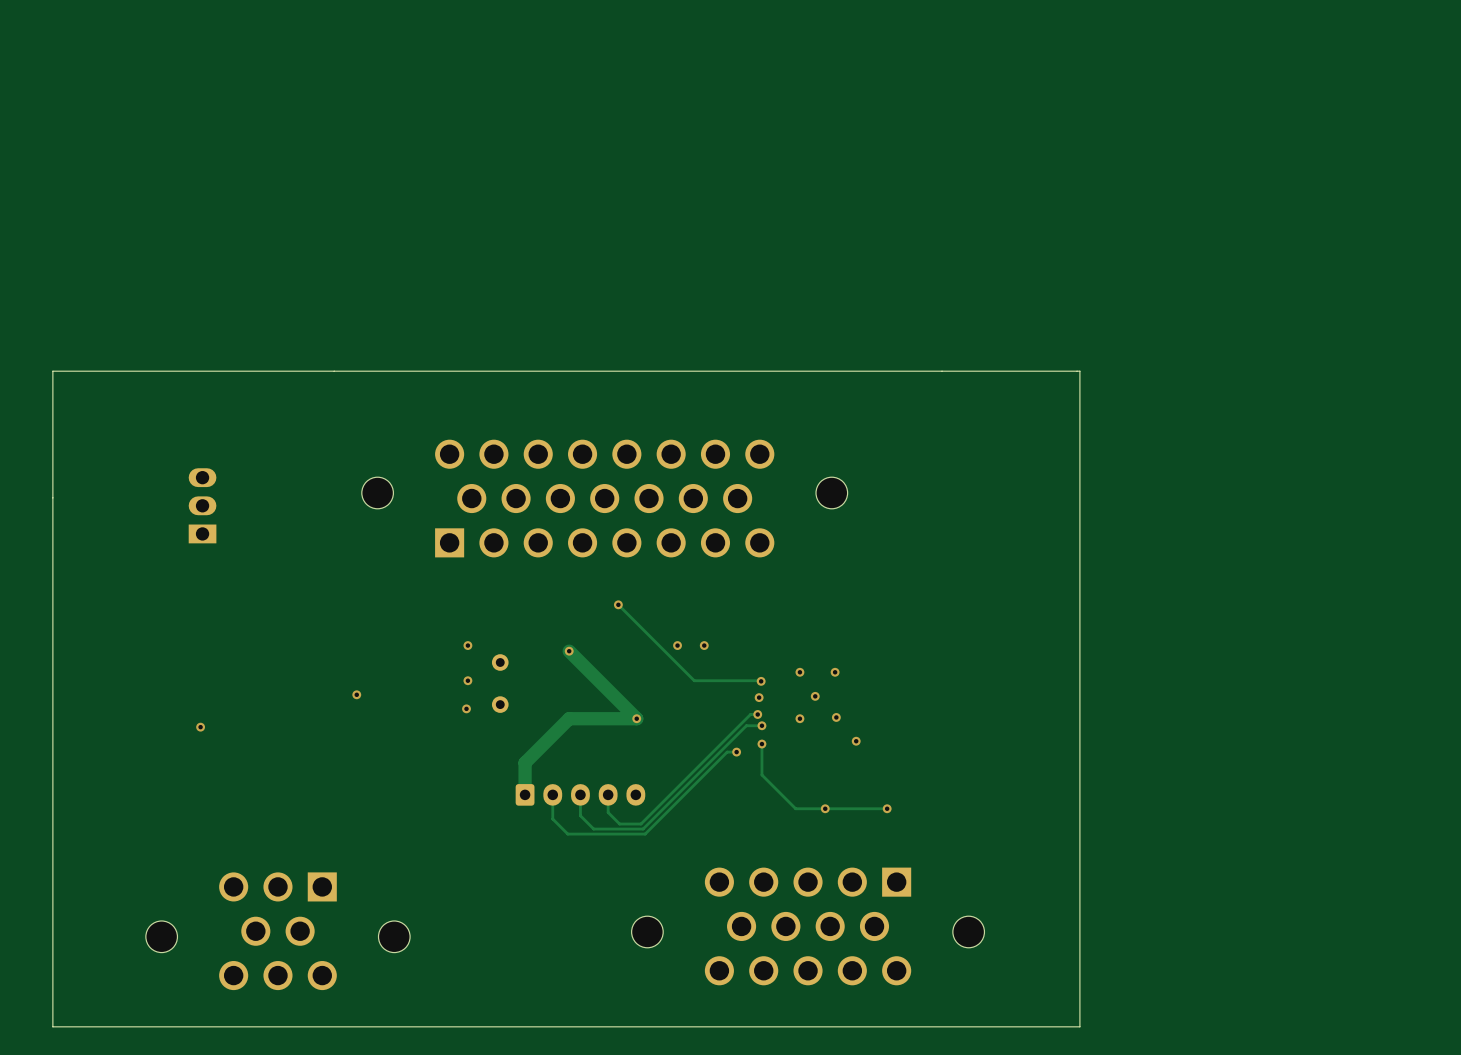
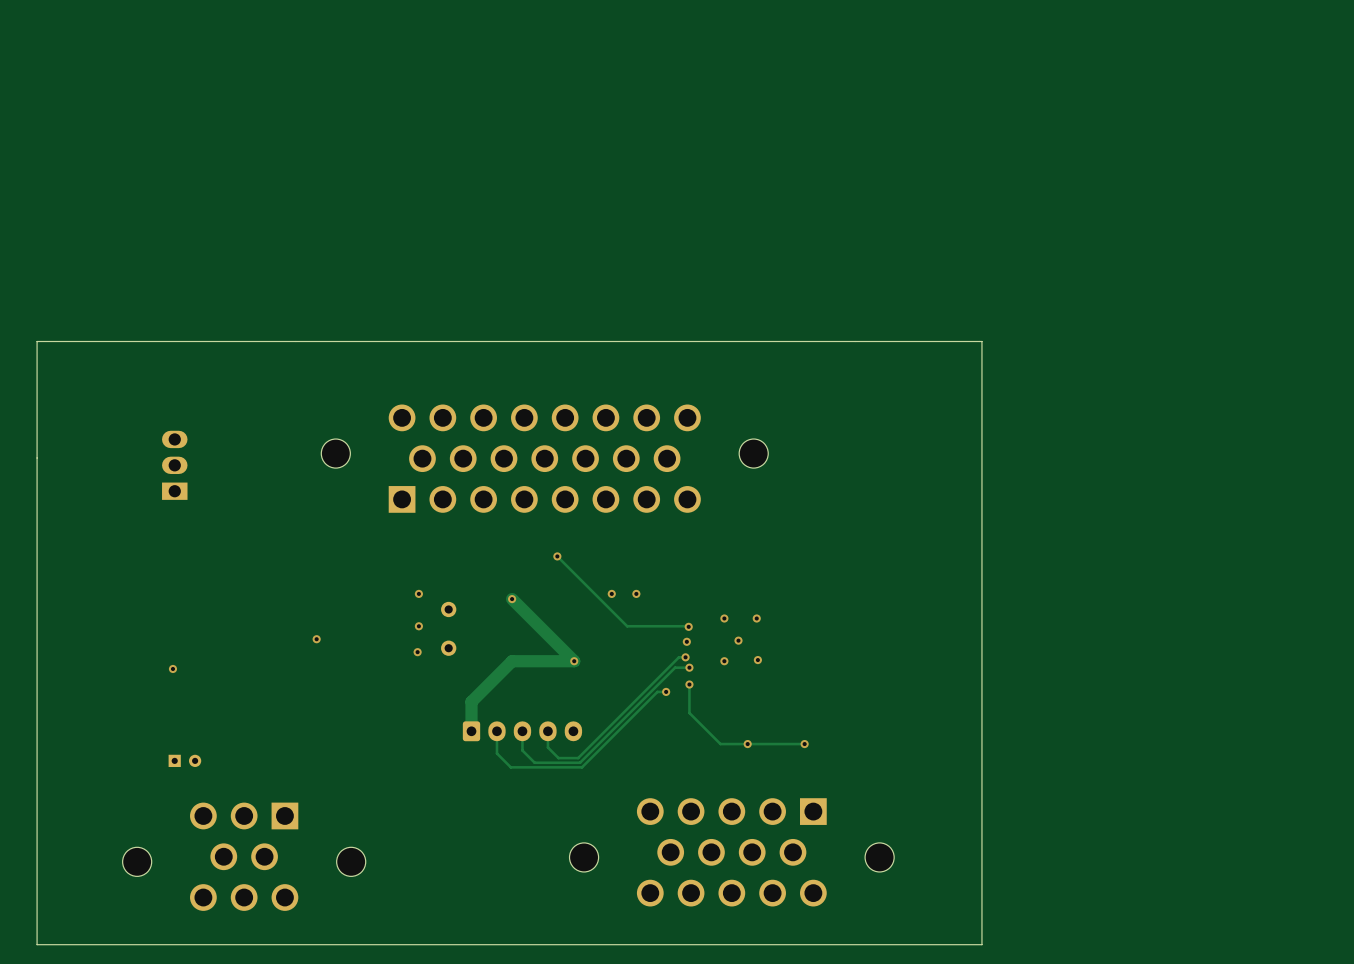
via: (856, 741) -> none
part: none -> (184, 760)

